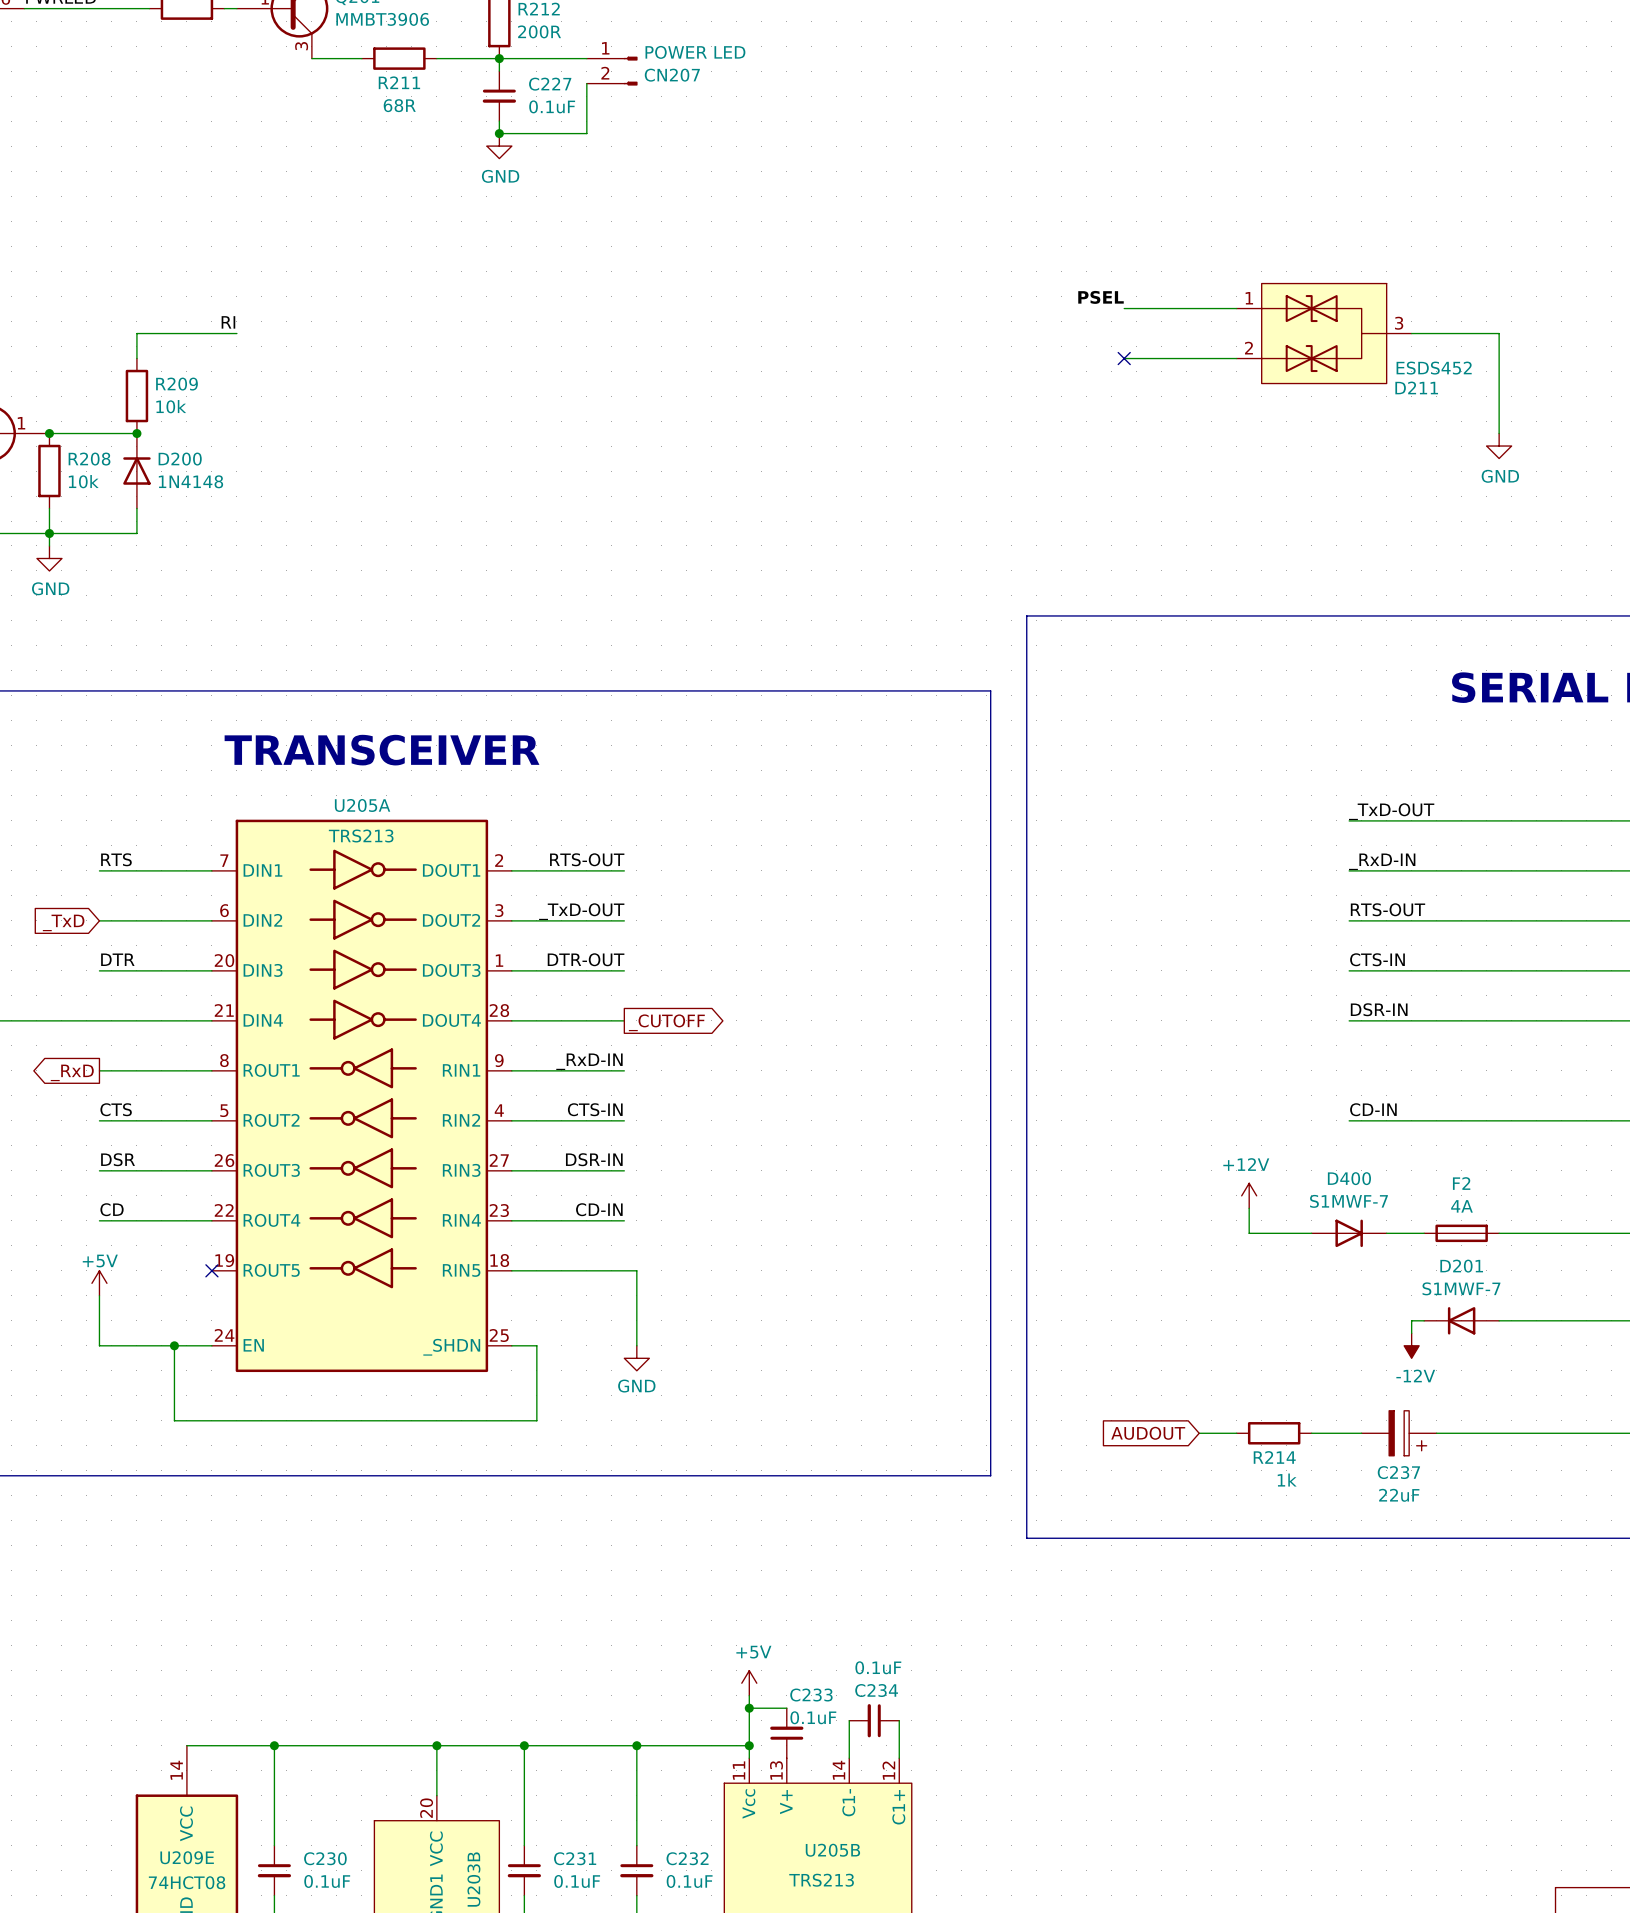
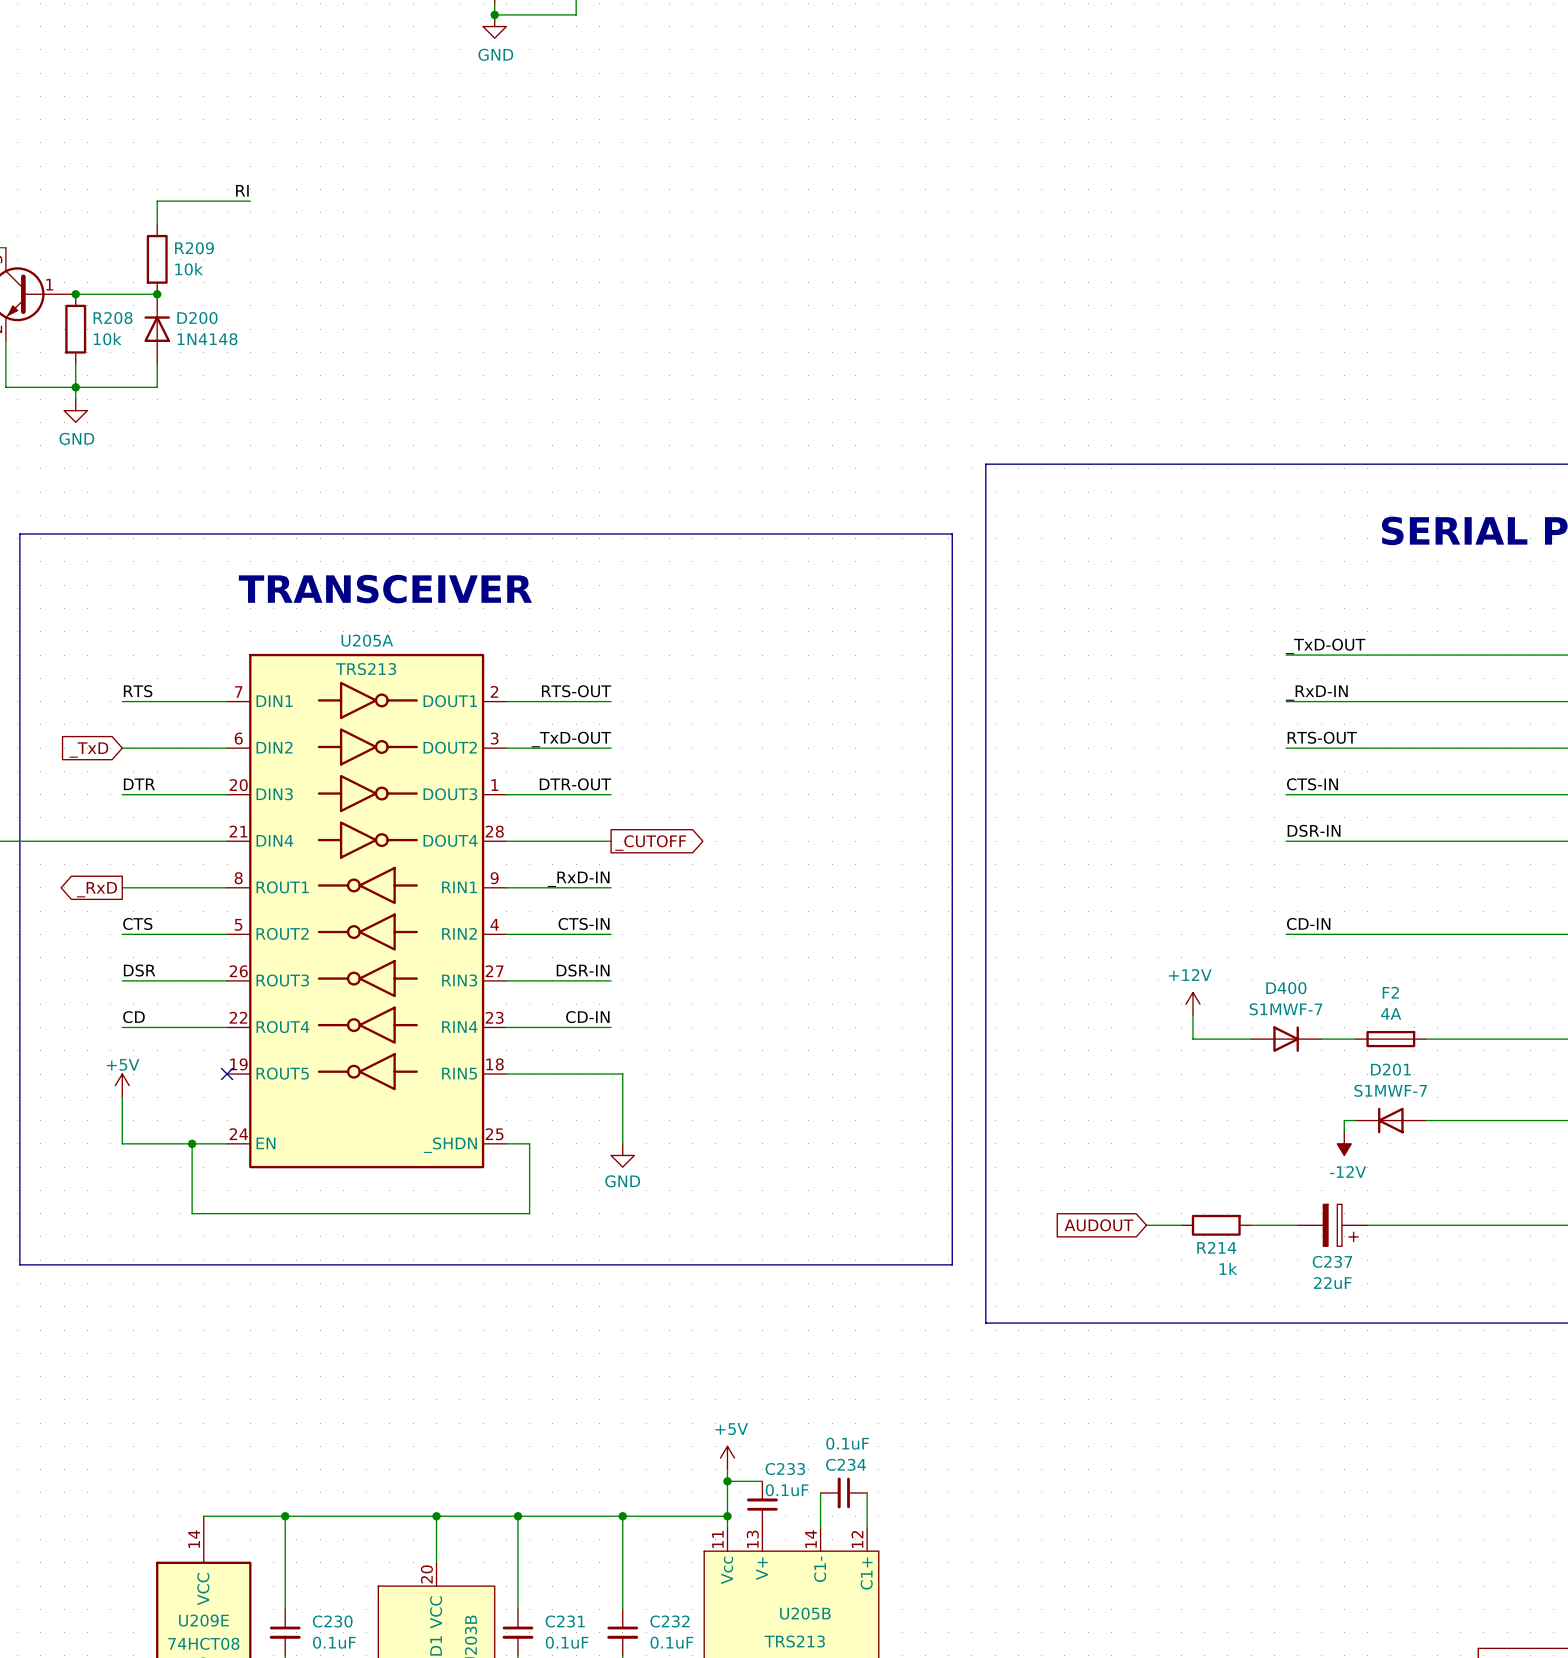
label: PSEL (1101, 297) -> none
wire: (1124, 308) (1236, 308) -> none
D211: ESDS452 (1324, 333) -> none
wire: (1411, 333) (1499, 333) (1499, 433) -> none
wire: (1124, 358) (1236, 358) -> none
no-connect mark: (1124, 358) -> none
power symbol: GND (1499, 446) -> none

